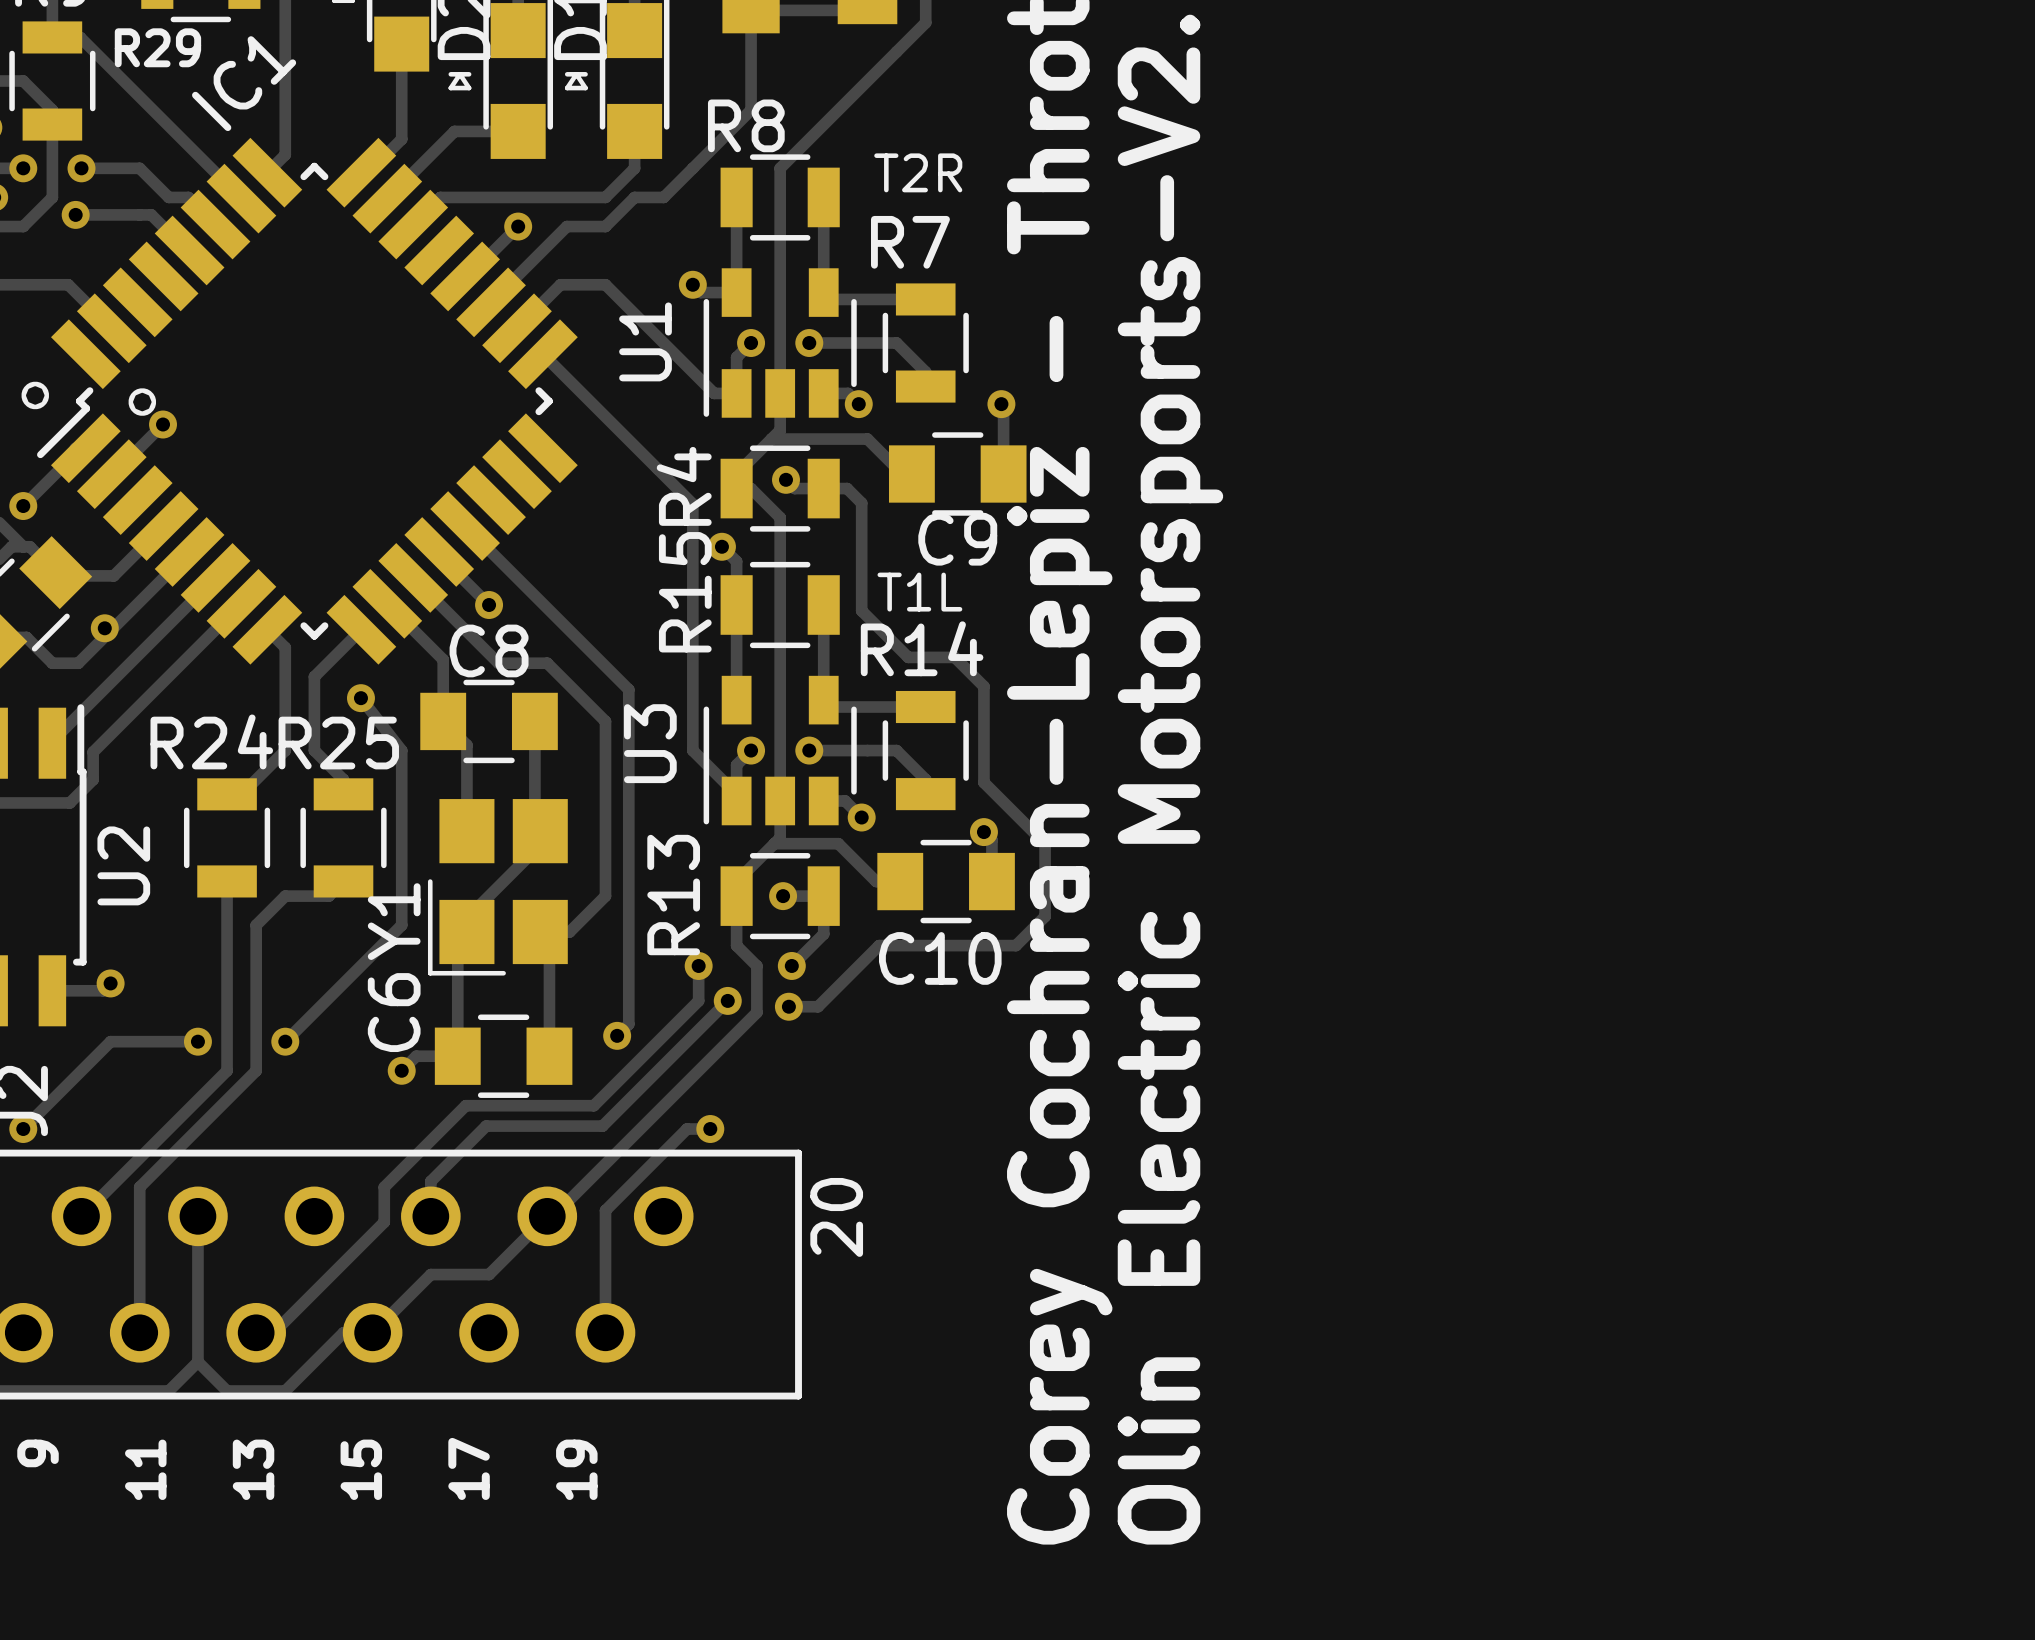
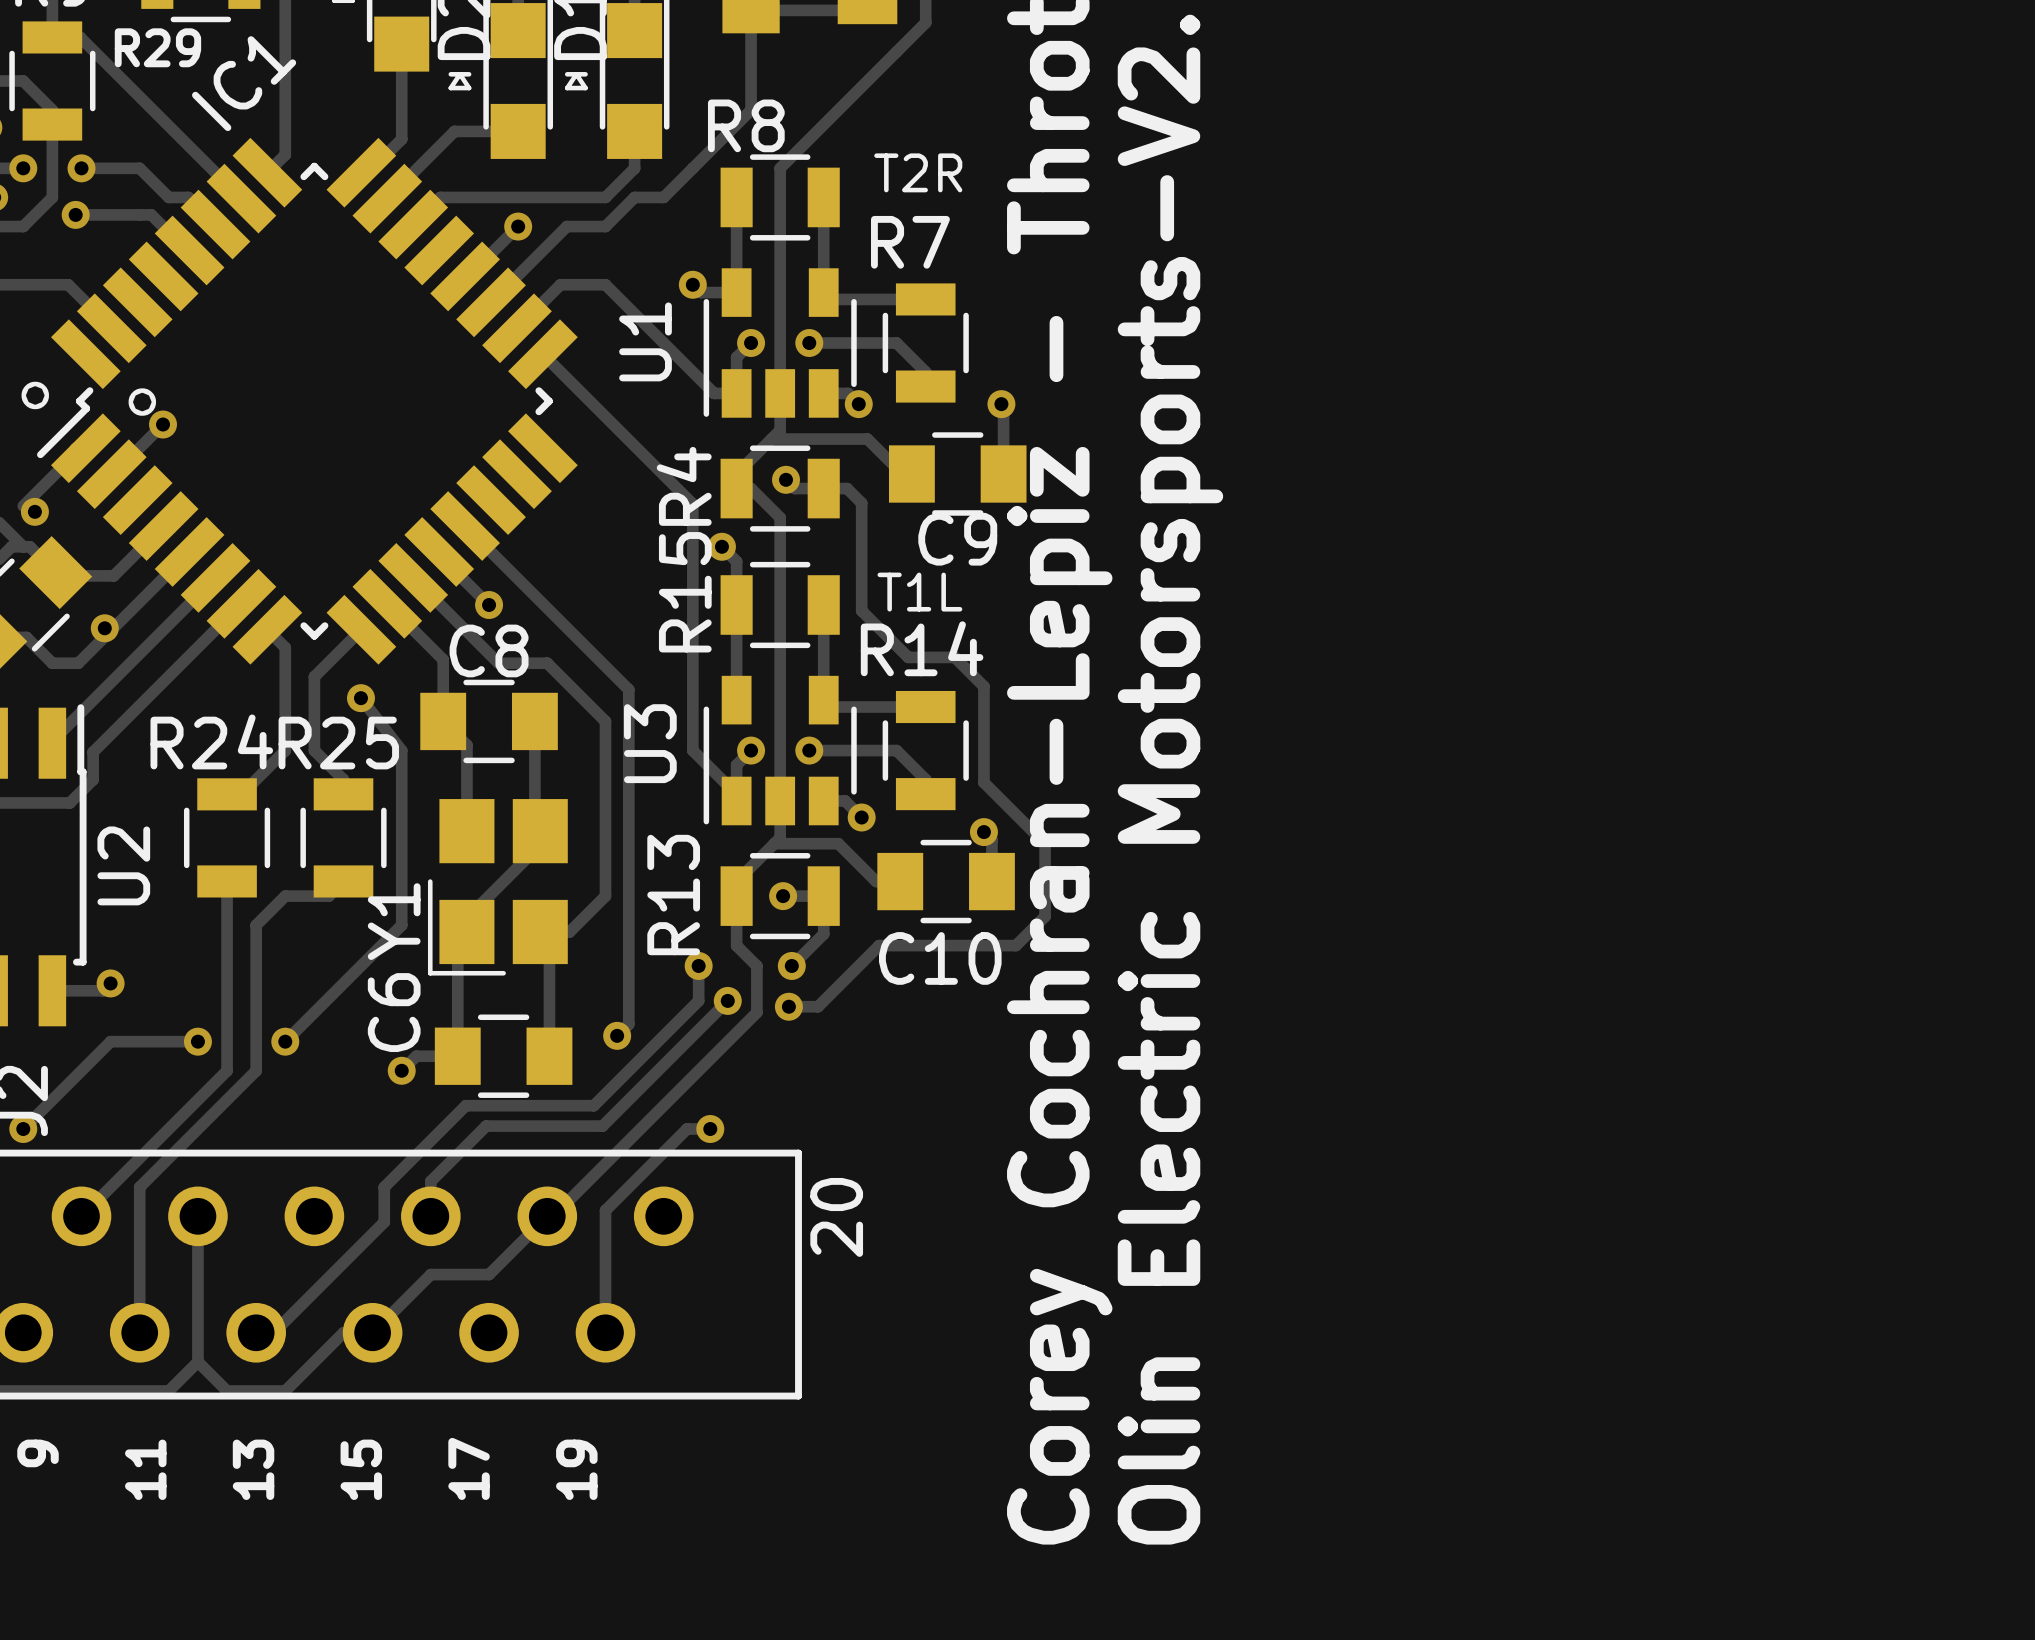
via position: (23, 506) -> (34, 511)

